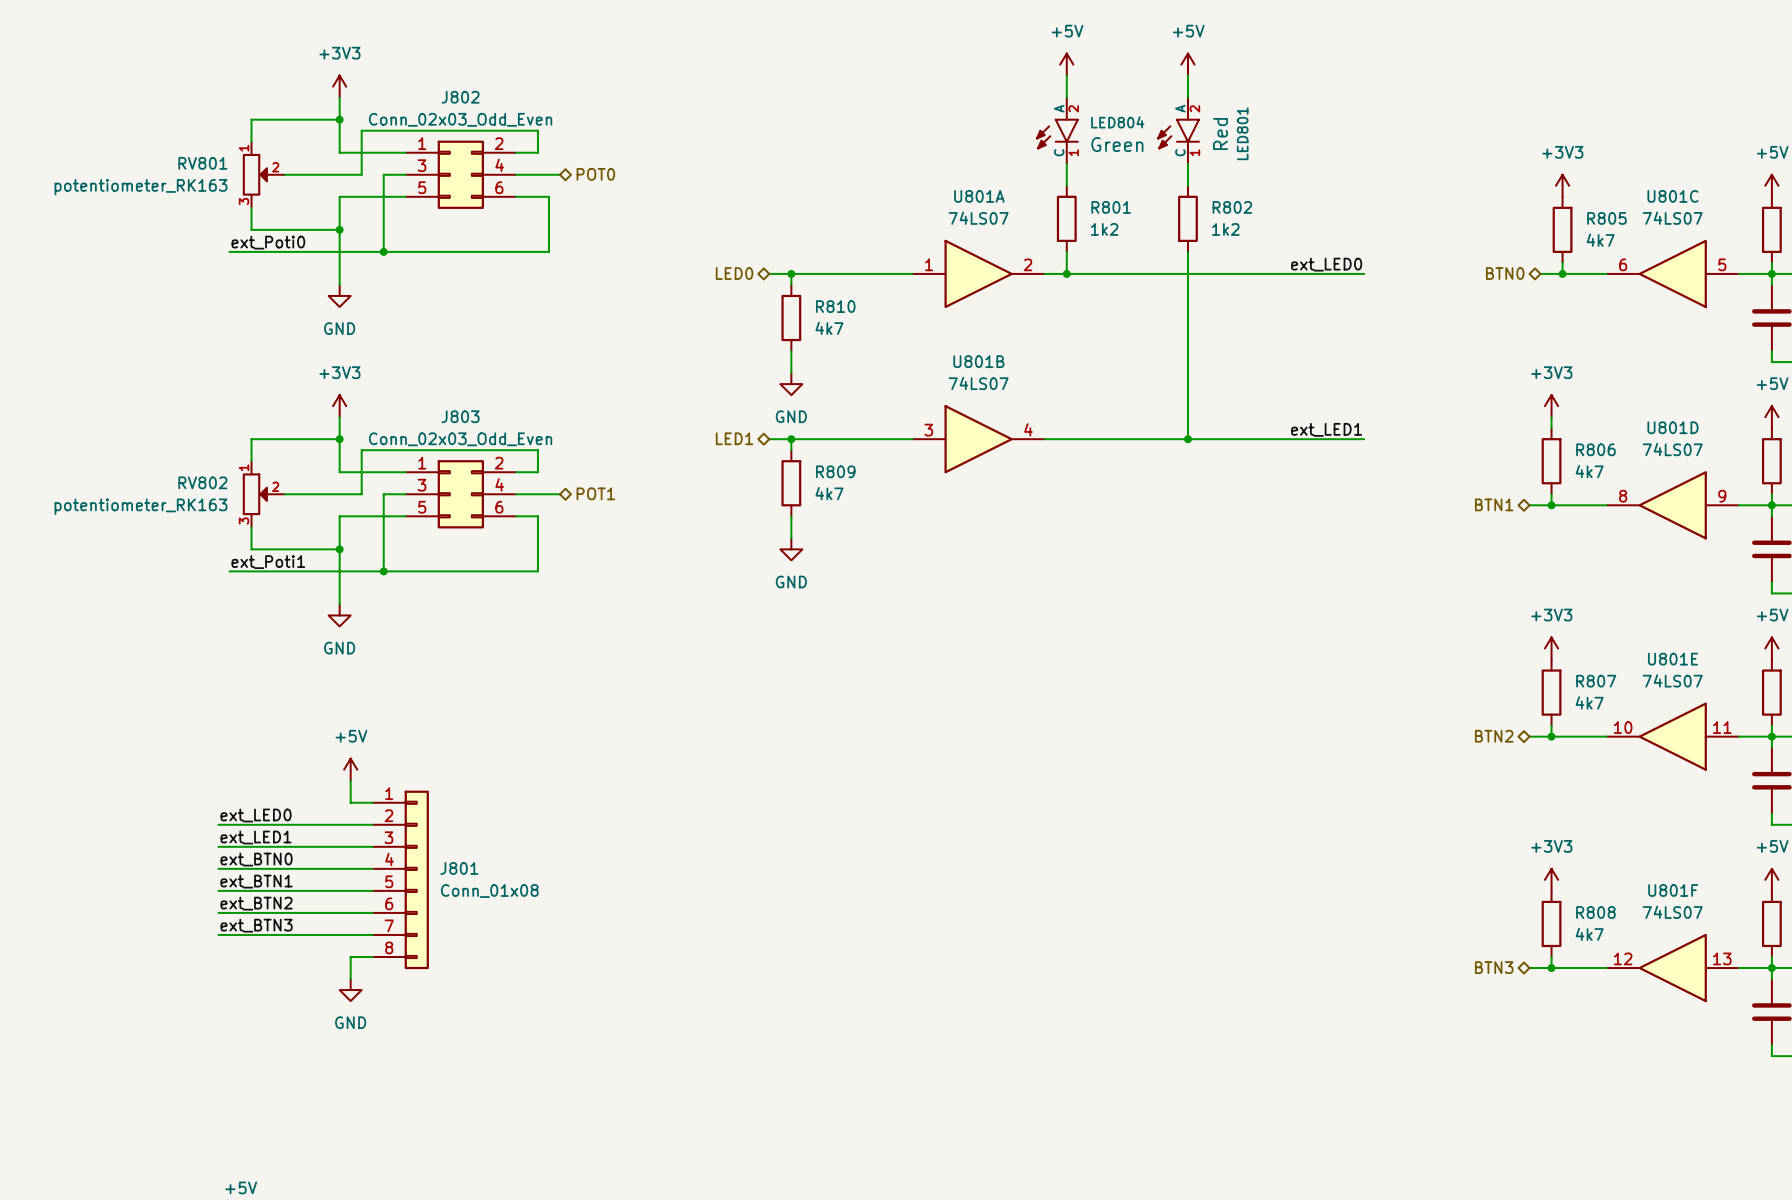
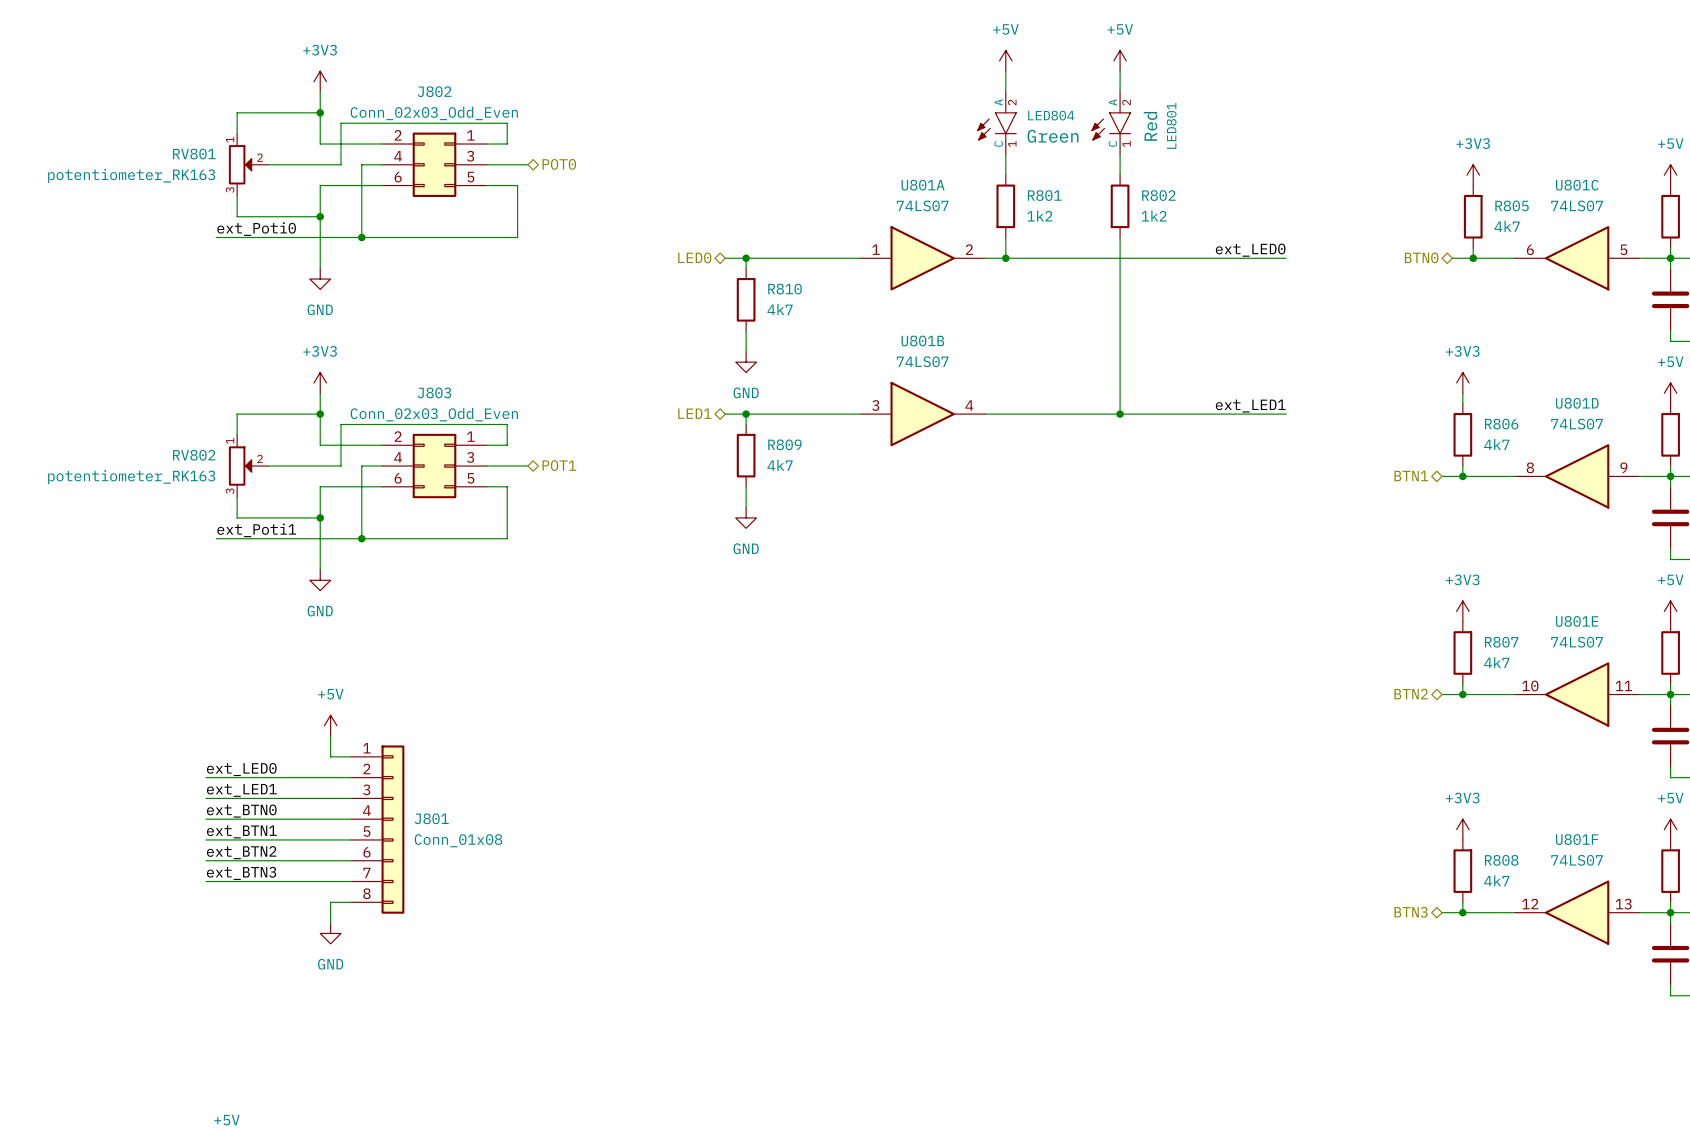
J802 flip: as is (460, 174) -> left-right (434, 164)
J803 flip: as is (460, 494) -> left-right (434, 466)

